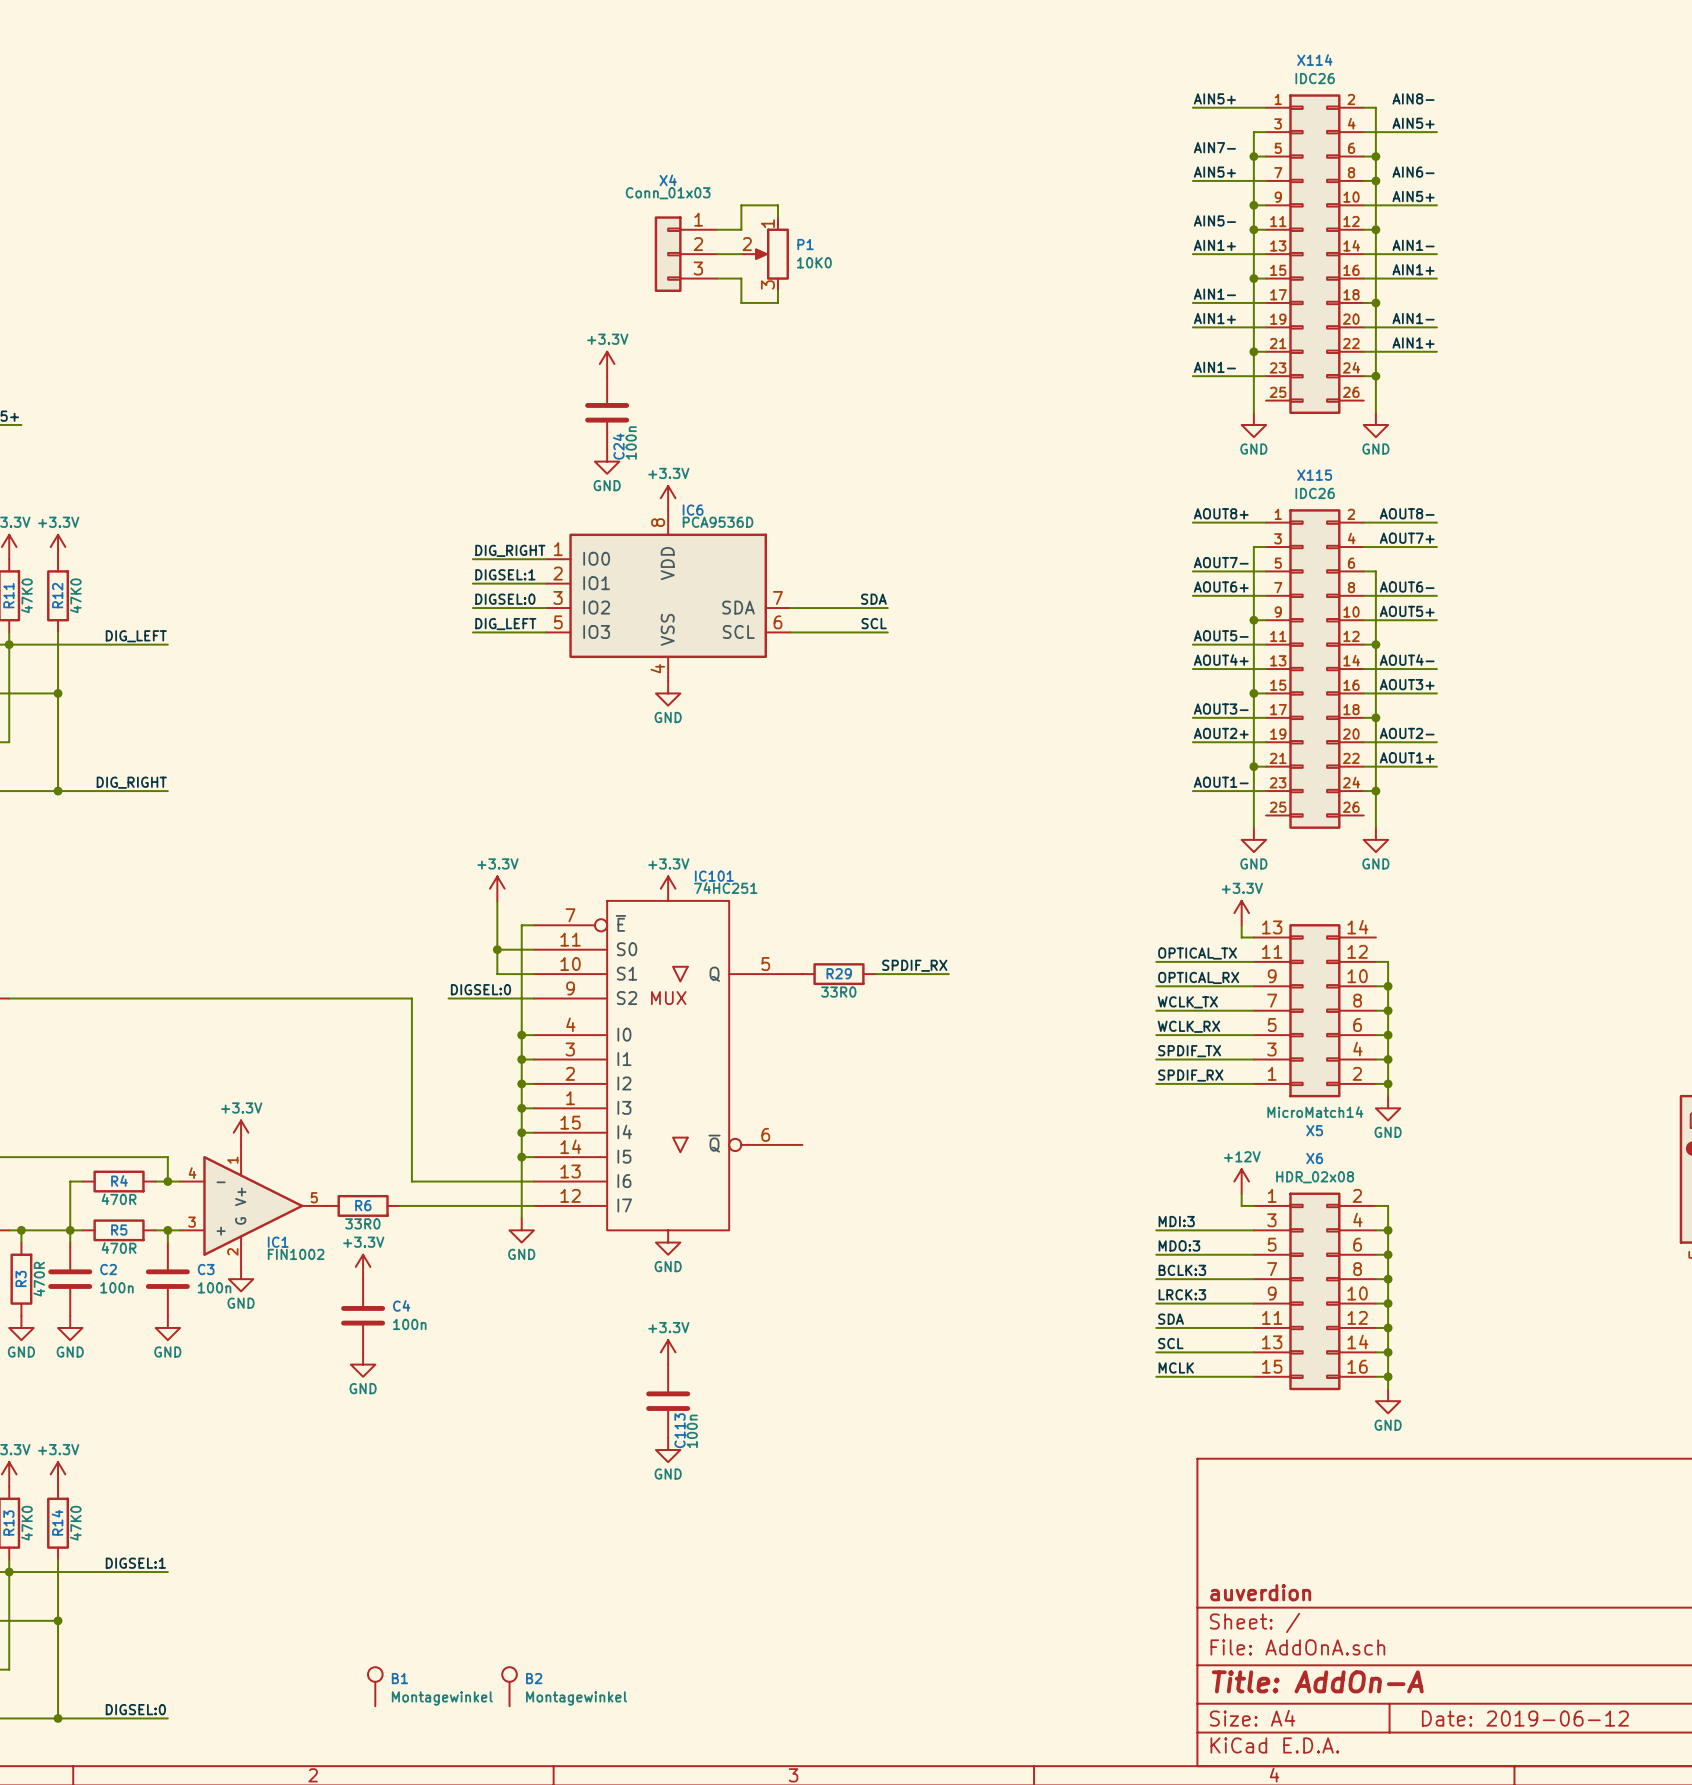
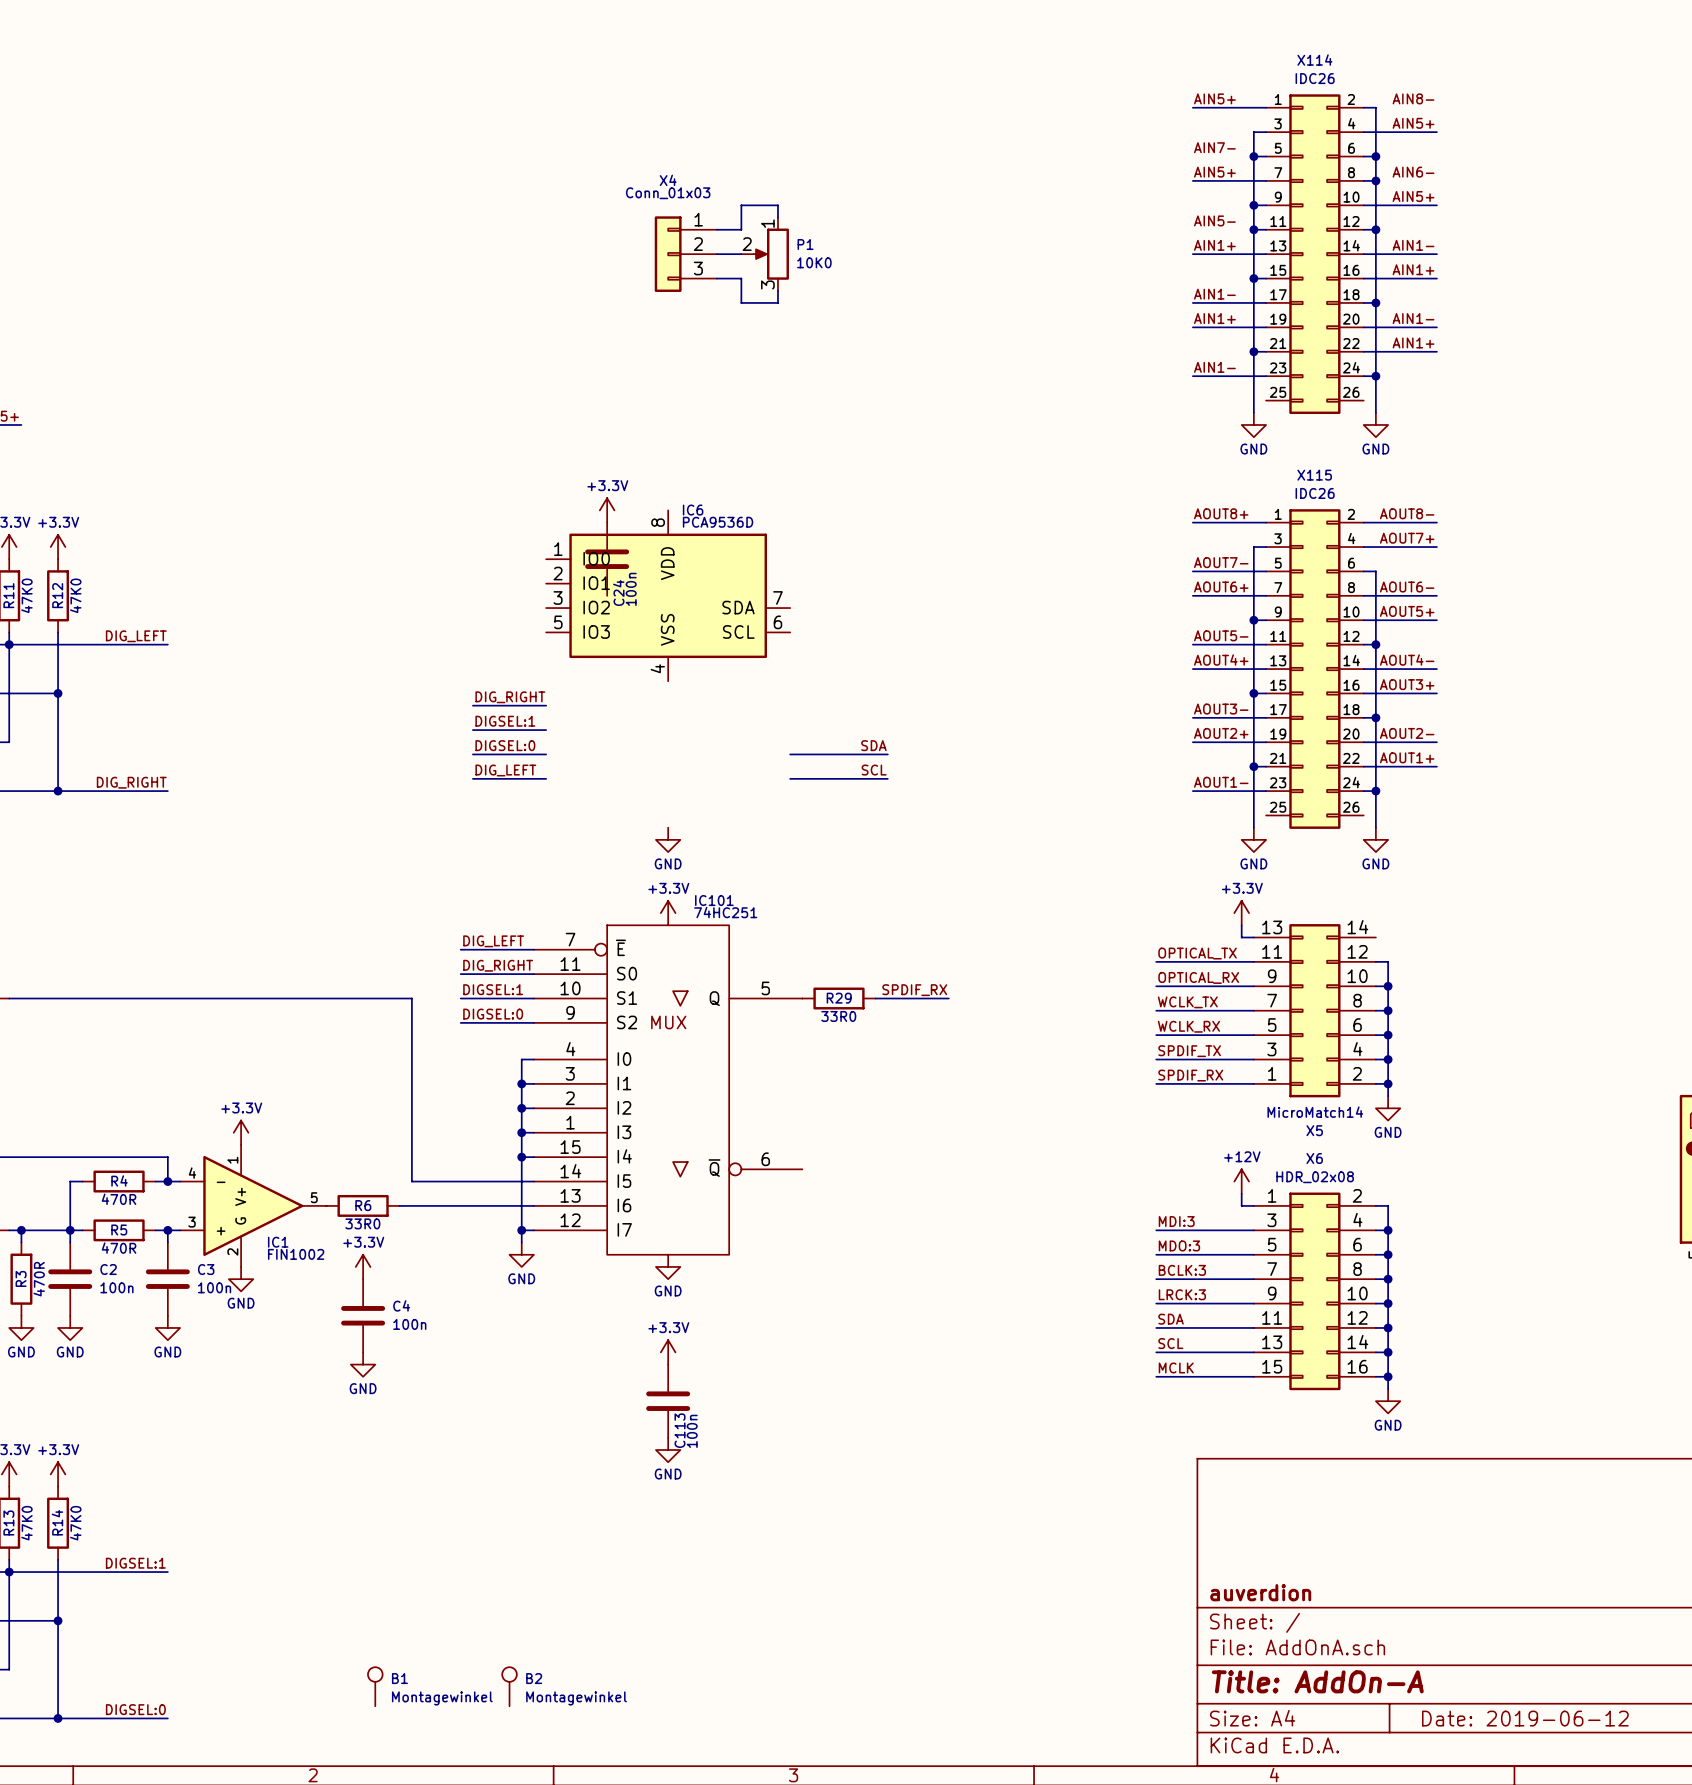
power symbol: +3.3V (607, 363) -> none
C24 position: (607, 412) -> (607, 559)
power symbol: GND (607, 461) -> none
power symbol position: +3.3V (668, 498) -> +3.3V (607, 510)
label position: DIG_RIGHT (510, 550) -> DIG_RIGHT (510, 697)
wire: (472, 559) (546, 559) -> (472, 705) (546, 705)
label position: DIGSEL:1 (505, 574) -> DIGSEL:1 (505, 721)
wire: (472, 583) (546, 583) -> (472, 730) (546, 730)
label: DIGSEL:0 (505, 599) -> none
label position: SDA (873, 599) -> SDA (873, 745)
wire: (472, 608) (546, 608) -> (472, 754) (546, 754)
wire: (790, 608) (887, 608) -> (790, 754) (887, 754)
label position: SCL (874, 623) -> SCL (874, 770)
label position: DIG_LEFT (505, 624) -> DIG_LEFT (505, 770)
wire: (472, 632) (546, 632) -> (472, 778) (546, 778)
wire: (790, 632) (887, 632) -> (790, 778) (887, 778)
power symbol position: GND (668, 693) -> GND (668, 839)
label: none -> DIGSEL:0 (505, 745)
power symbol: +3.3V (497, 888) -> none
power symbol position: +3.3V (668, 888) -> +3.3V (668, 913)
wire: (497, 900) (497, 974) -> (460, 974) (497, 974)
wire: (533, 925) (521, 925) (521, 1059) -> none
label: none -> DIG_LEFT (493, 941)
wire: none -> (460, 949) (497, 949)
junction: (497, 949) -> none
label: none -> DIG_RIGHT (498, 965)
label position: SPDIF_RX (914, 965) -> SPDIF_RX (914, 990)
R29 position: (838, 974) -> (838, 998)
wire: (875, 974) (948, 974) -> (875, 998) (948, 998)
label position: DIGSEL:0 (480, 989) -> DIGSEL:0 (493, 1014)
label: none -> DIGSEL:1 (493, 989)
wire: (448, 998) (460, 998) -> none
wire: none -> (460, 1022) (533, 1022)
junction: (521, 1035) -> none
junction: (521, 1059) -> none
IC101 position: (668, 1065) -> (668, 1090)
power symbol position: GND (521, 1230) -> GND (521, 1254)
junction: none -> (521, 1230)
power symbol position: GND (668, 1242) -> GND (668, 1266)

